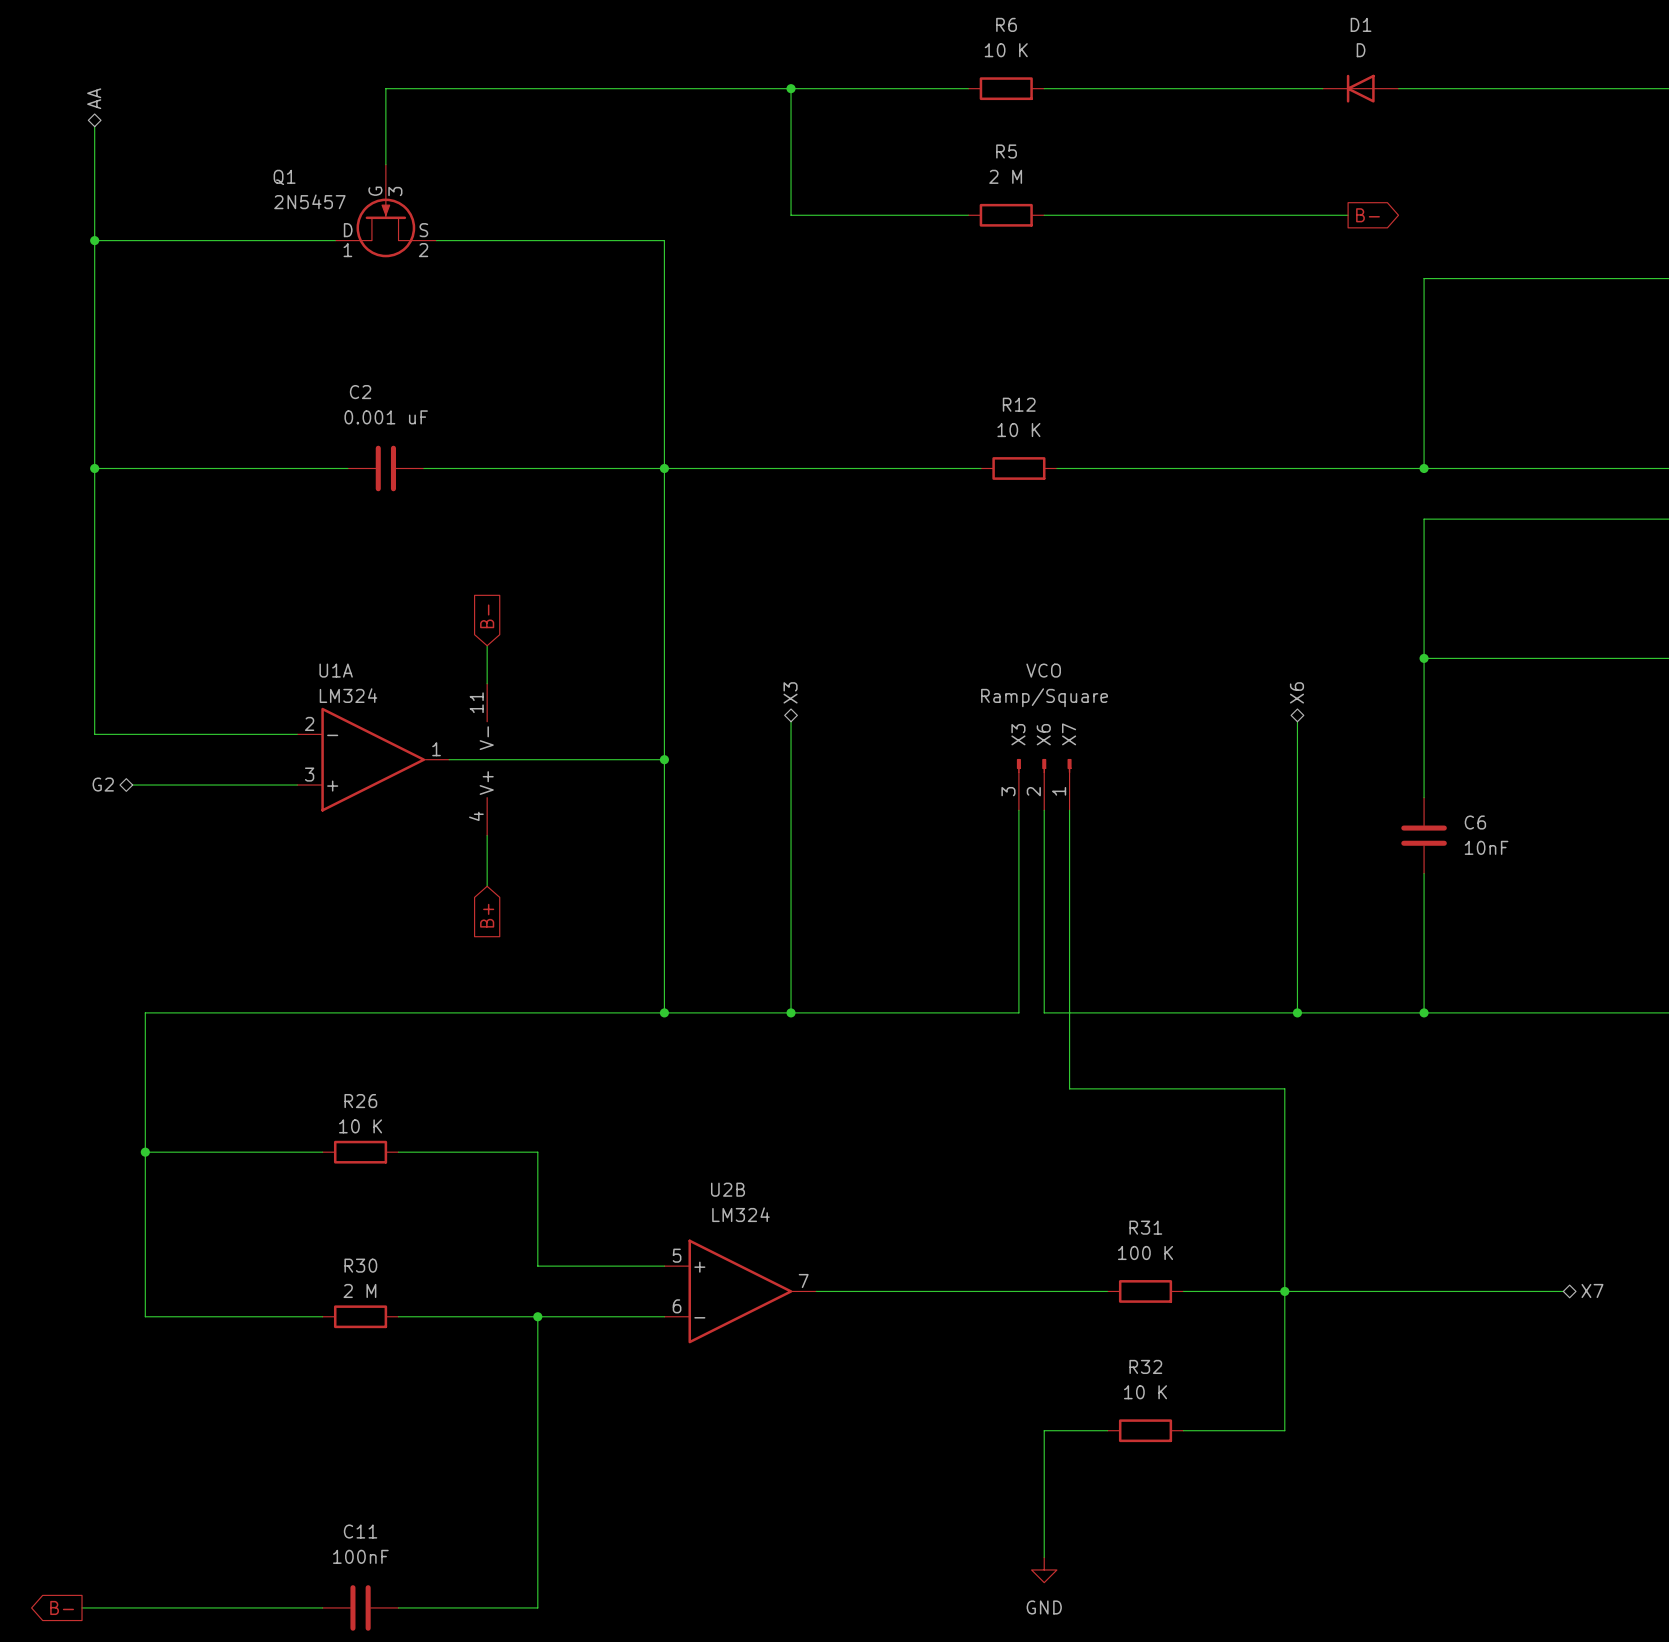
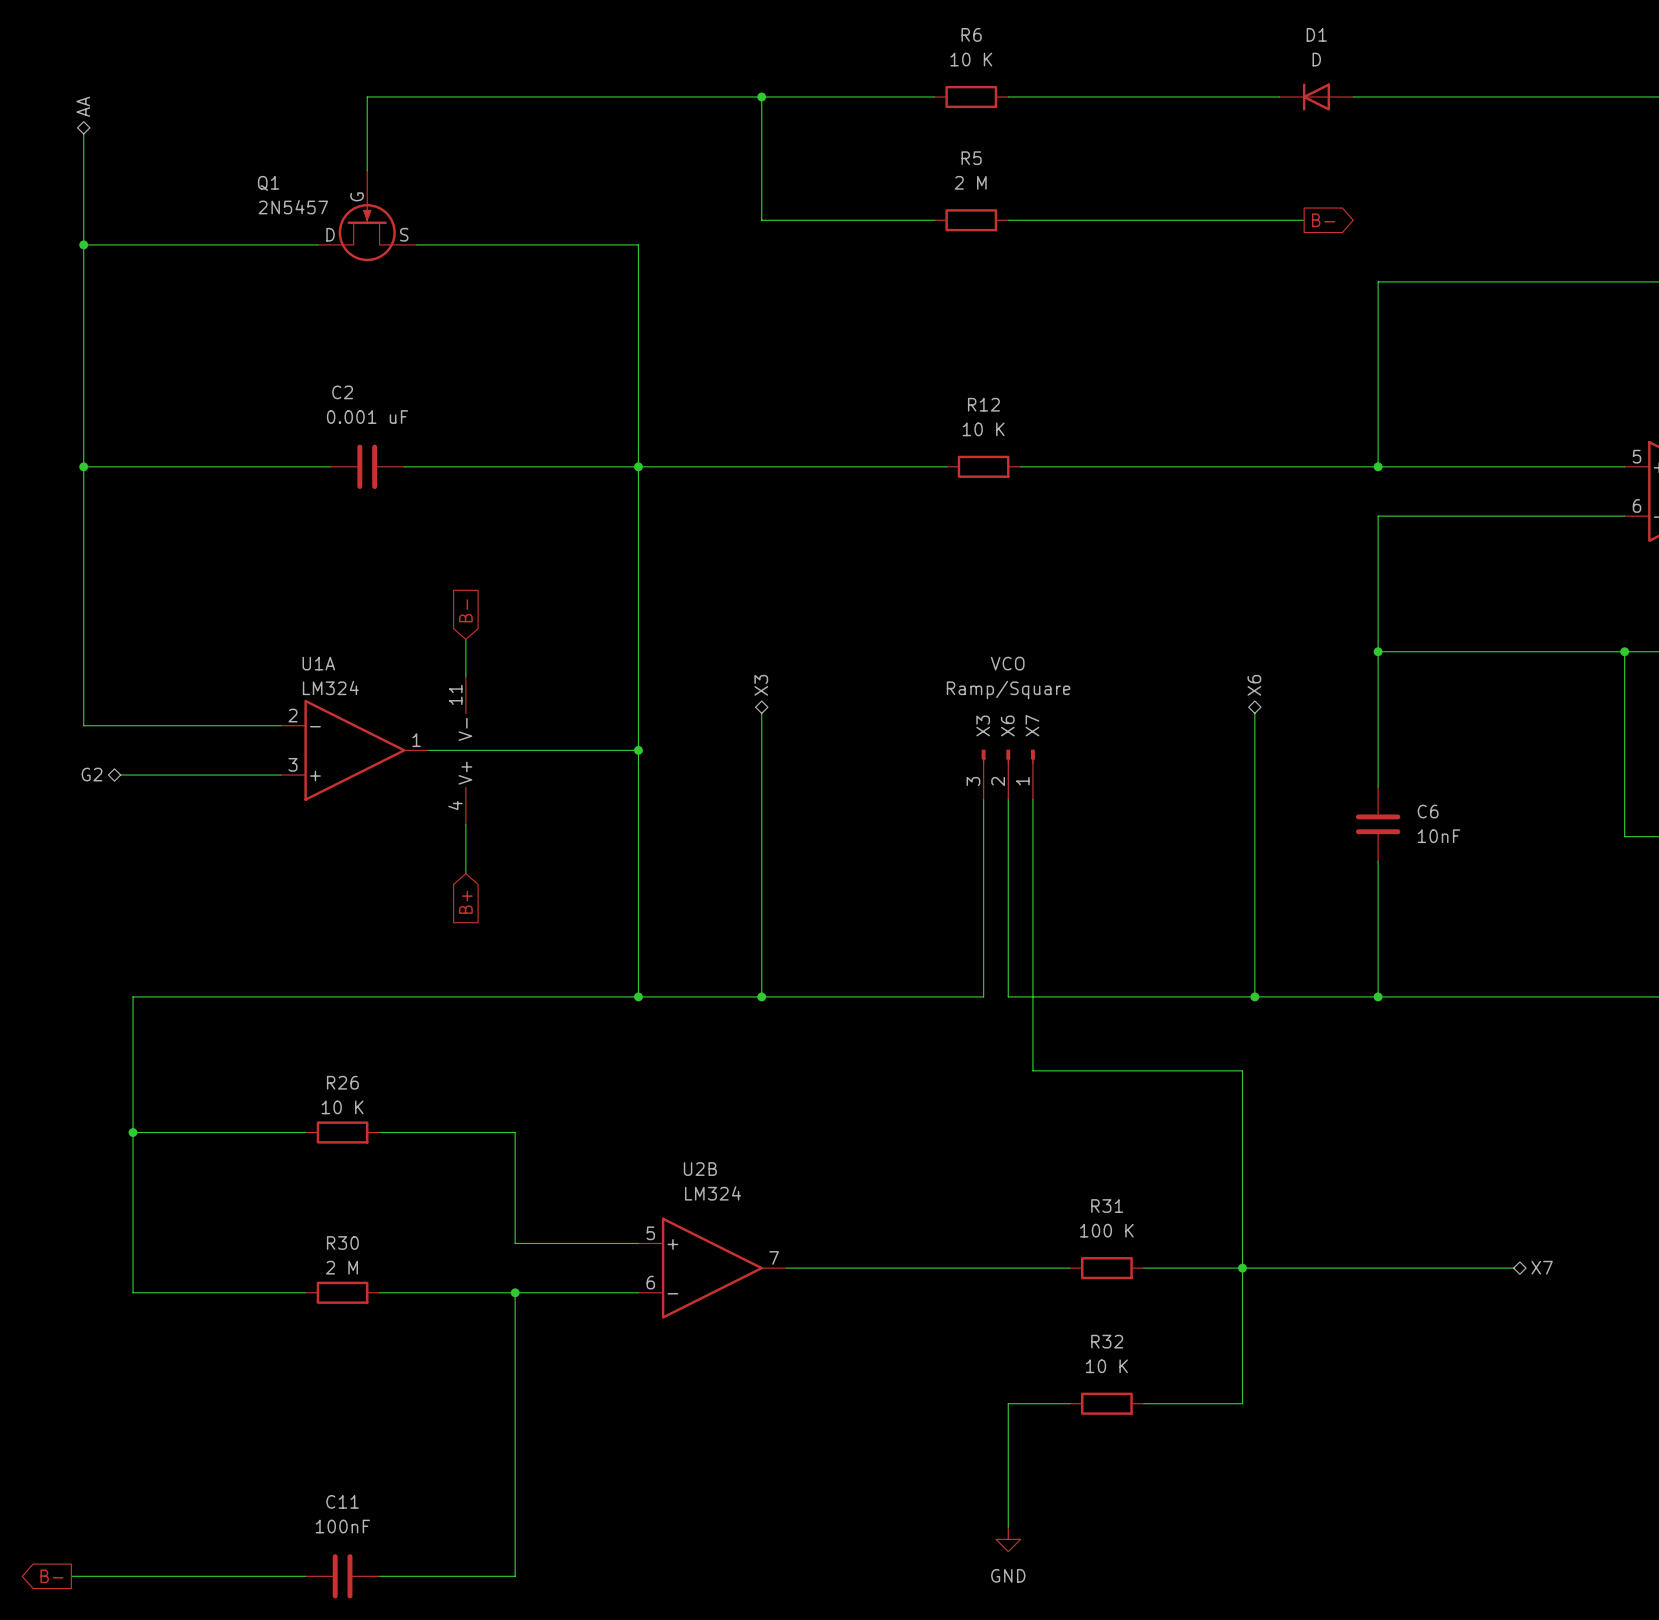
Q1 pin number: 3 (395, 191) -> none
Q1 pin number: 1 (347, 250) -> none
Q1 pin number: 2 (423, 250) -> none

